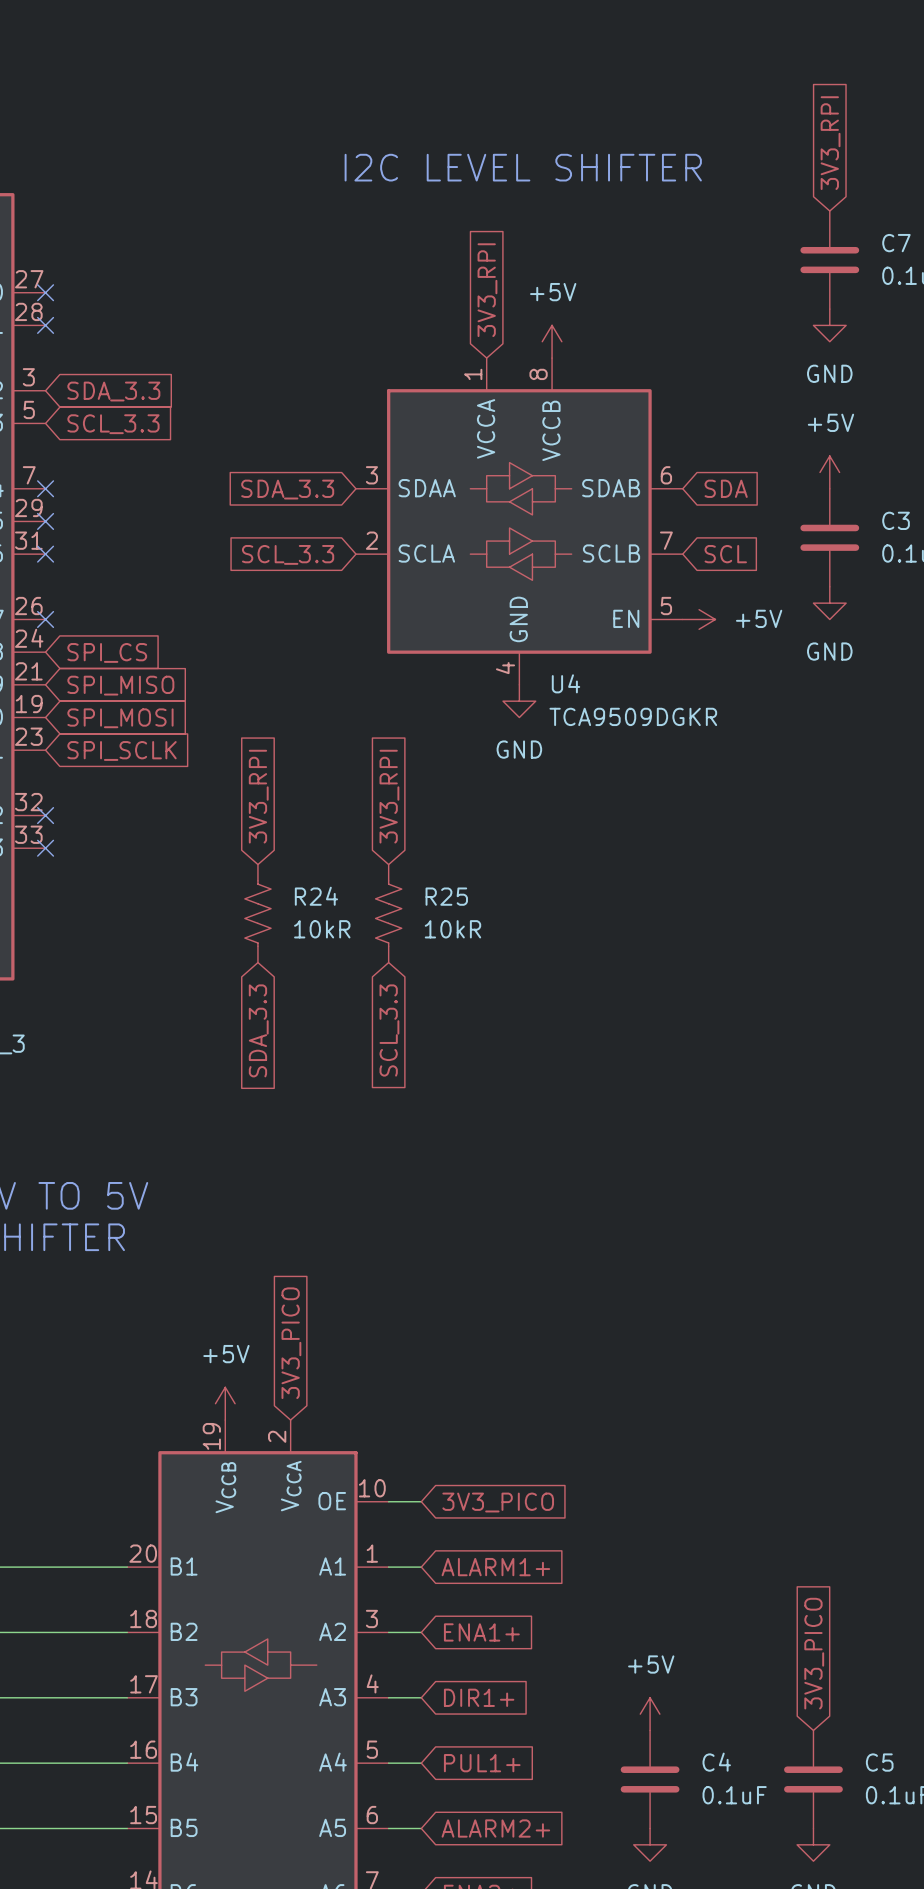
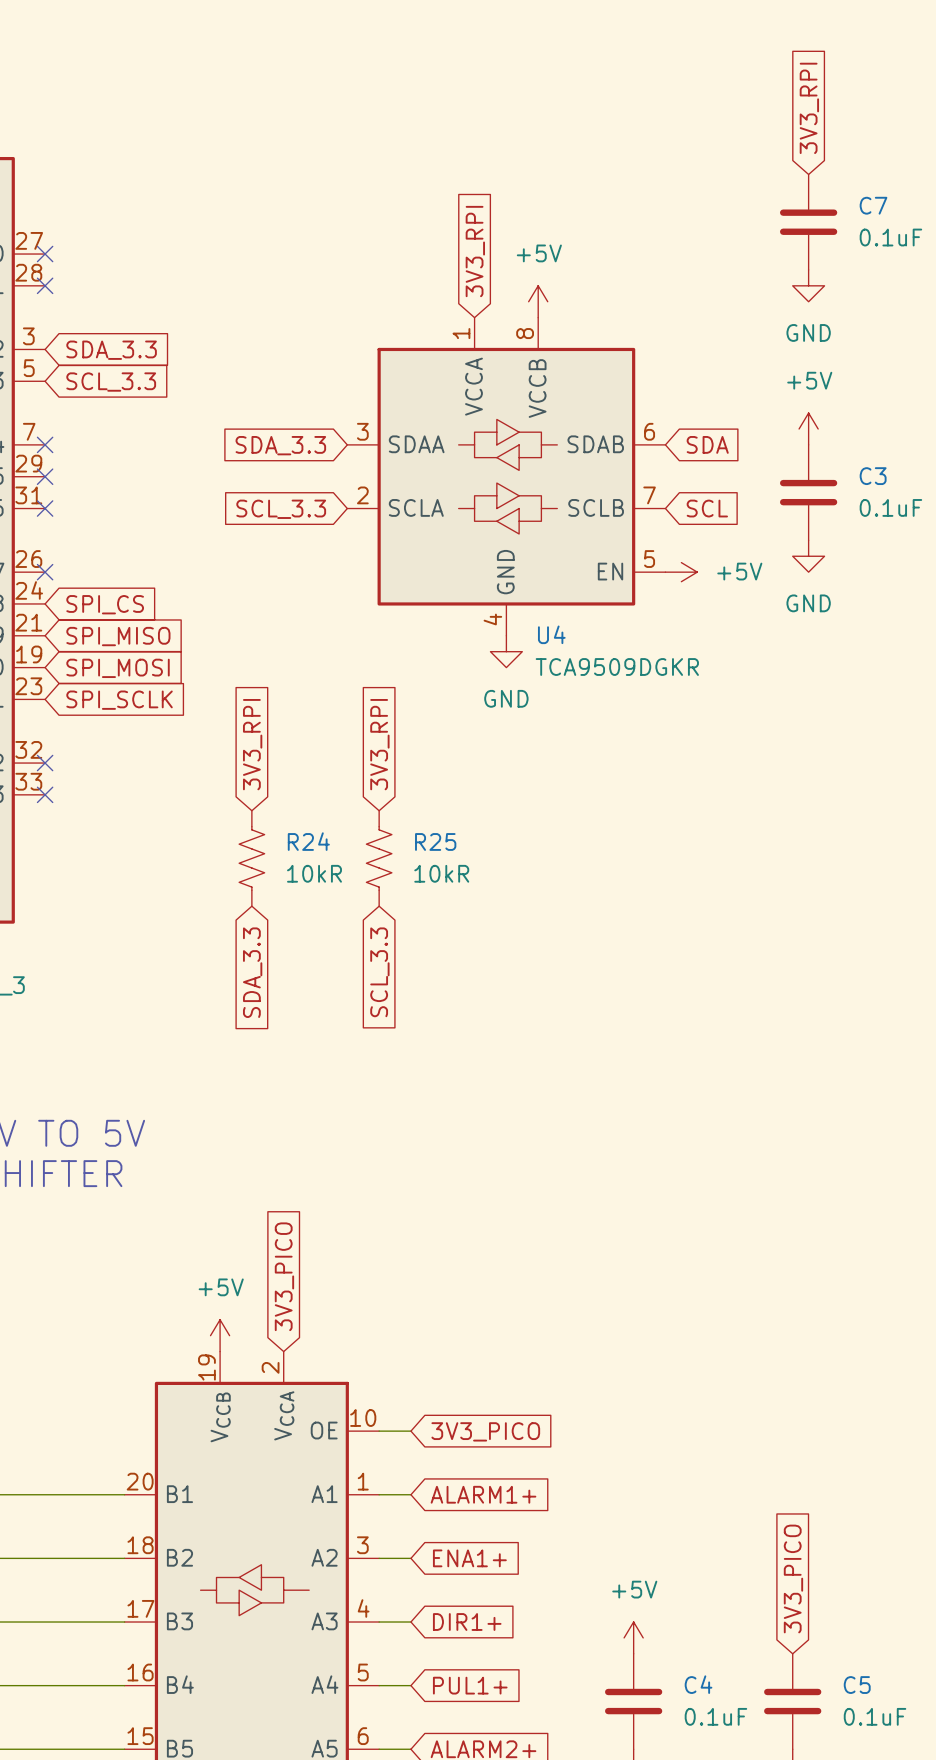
text: I2C LEVEL SHIFTER (523, 167) -> none

